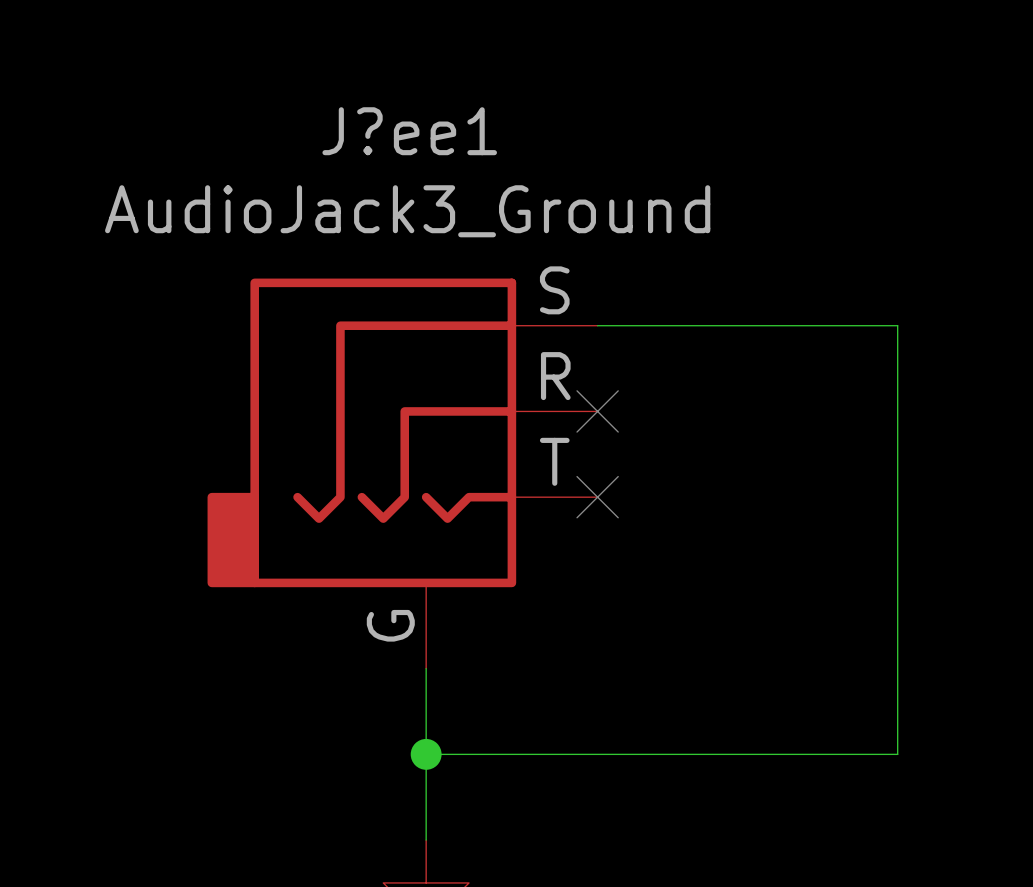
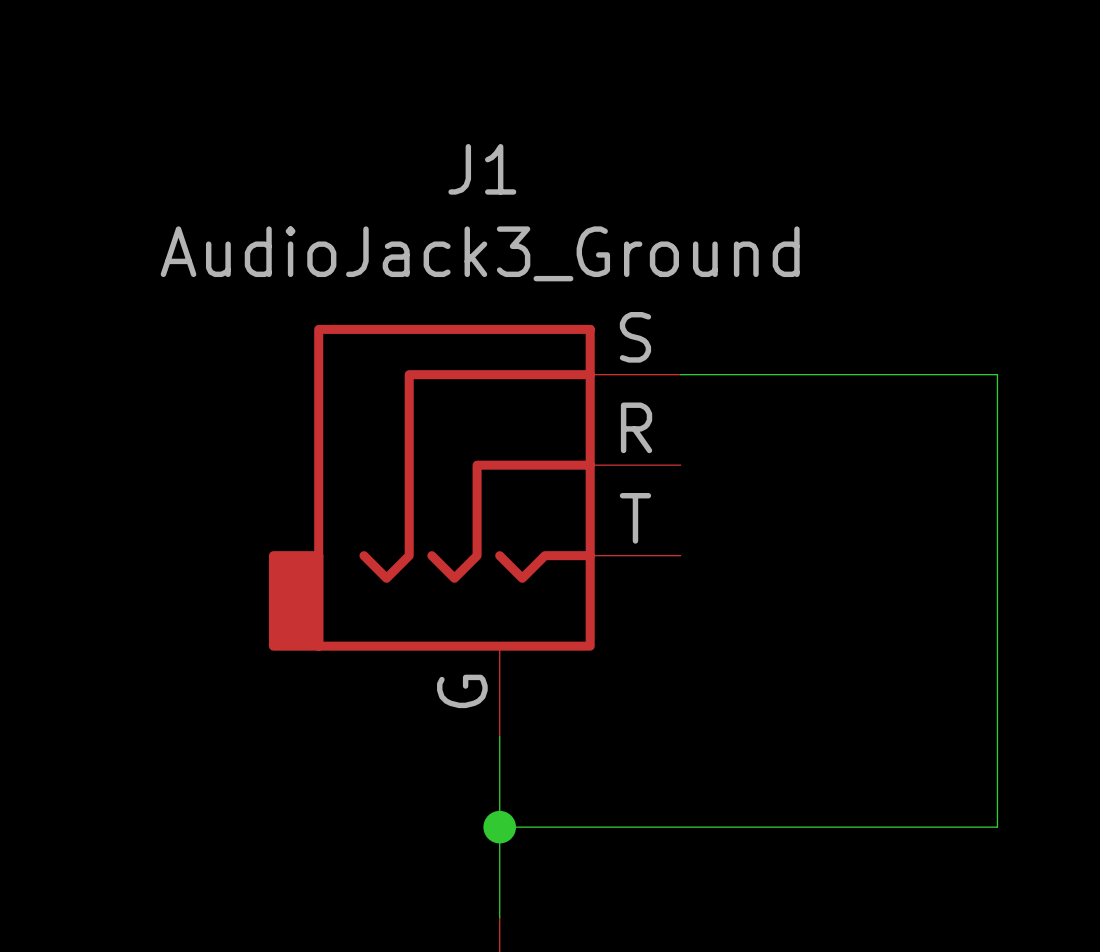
J?ee1 name: J?ee1 (409, 131) -> J1 (482, 169)
no-connect mark: (597, 411) -> none
no-connect mark: (597, 497) -> none

